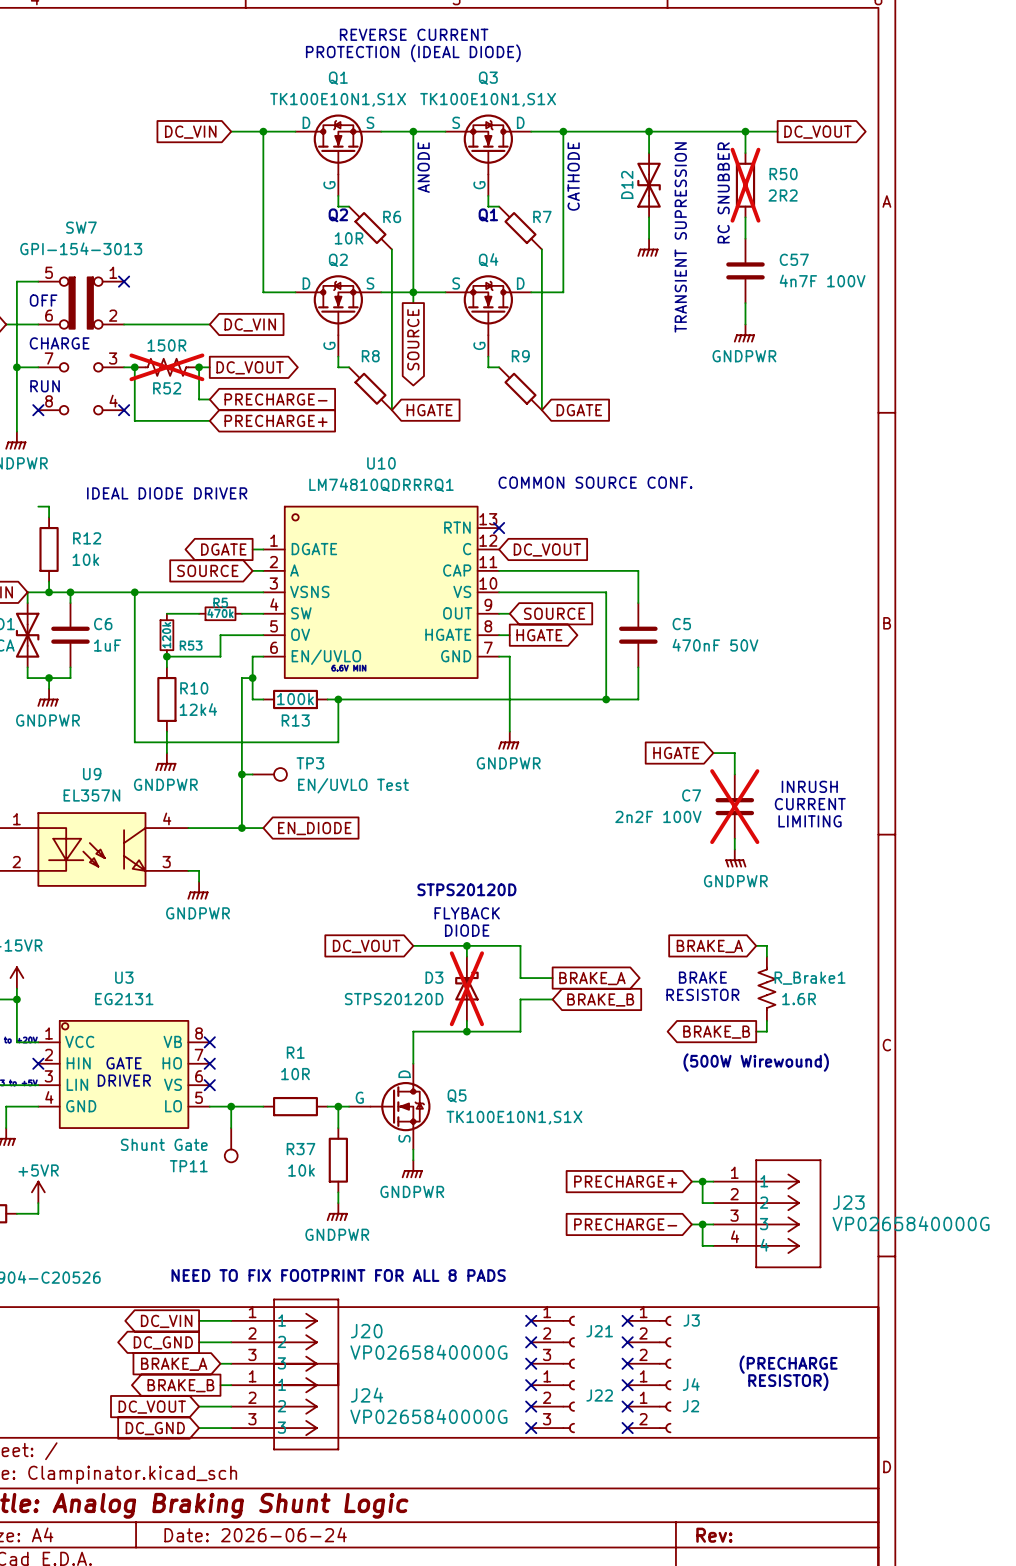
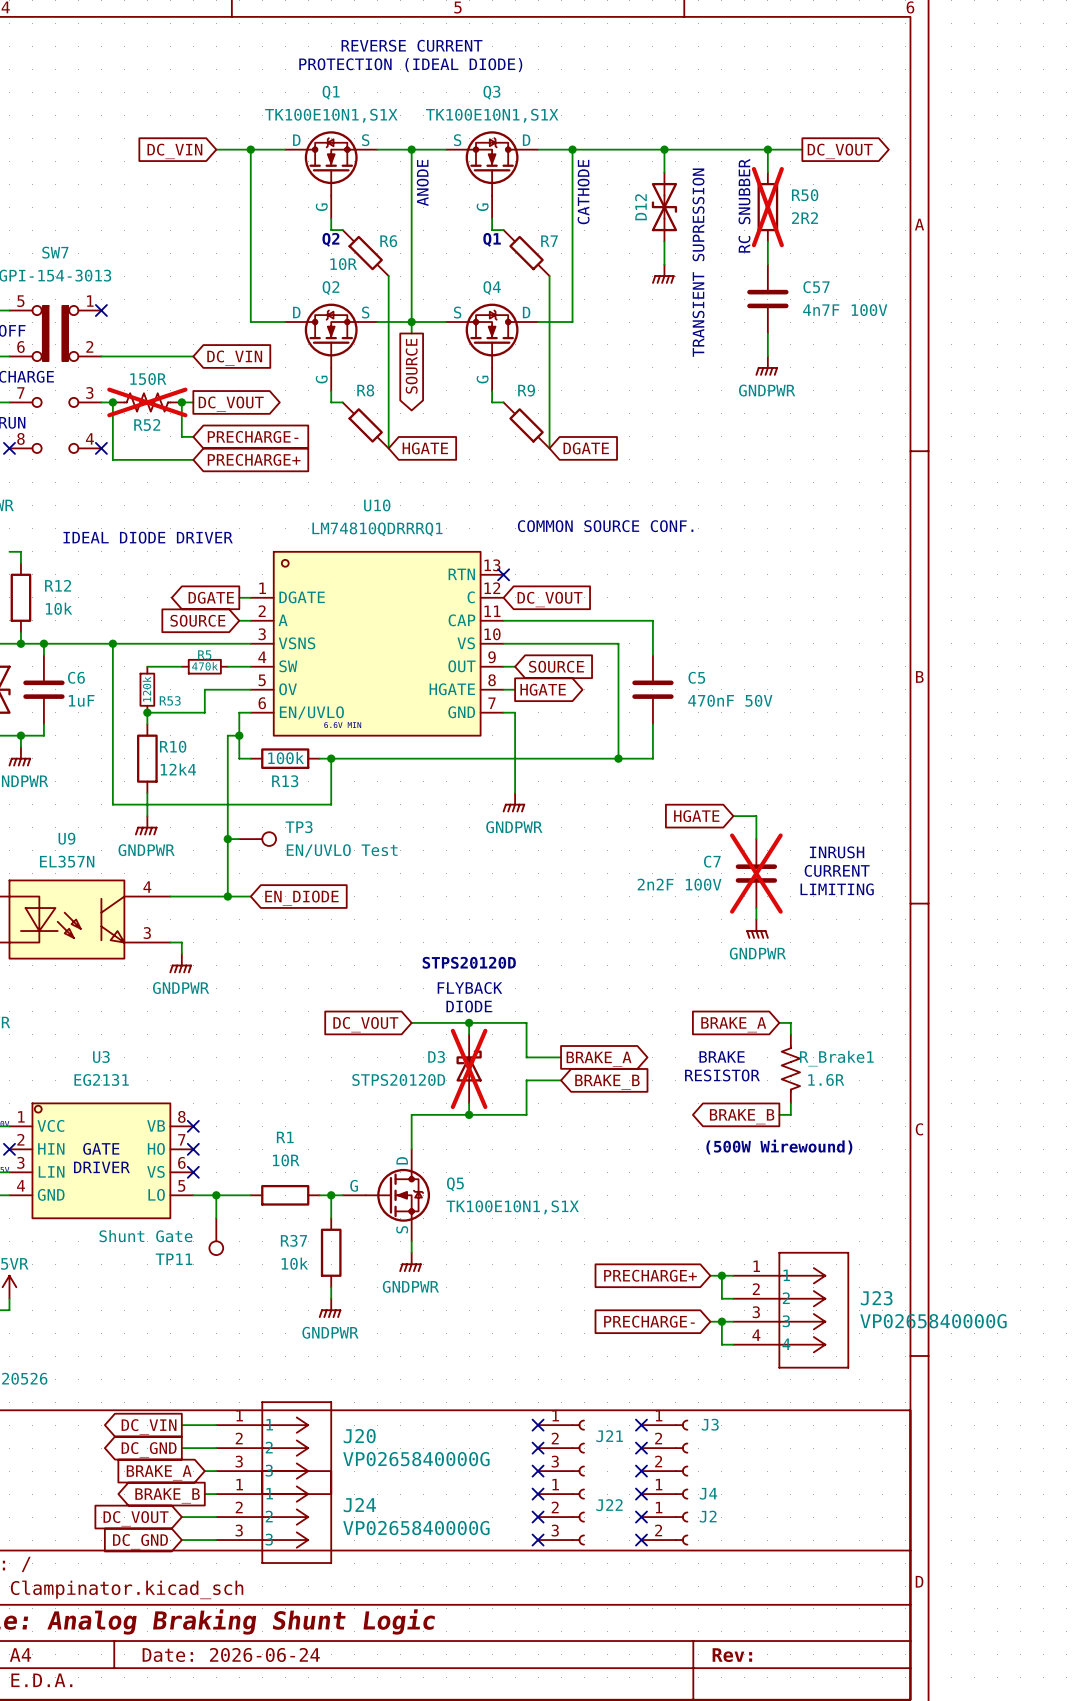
text: NEED TO FIX FOOTPRINT FOR ALL 8 PADS (338, 1275) -> none
text: (PRECHARGE (788, 1364) -> none
text: RESISTOR) (788, 1381) -> none

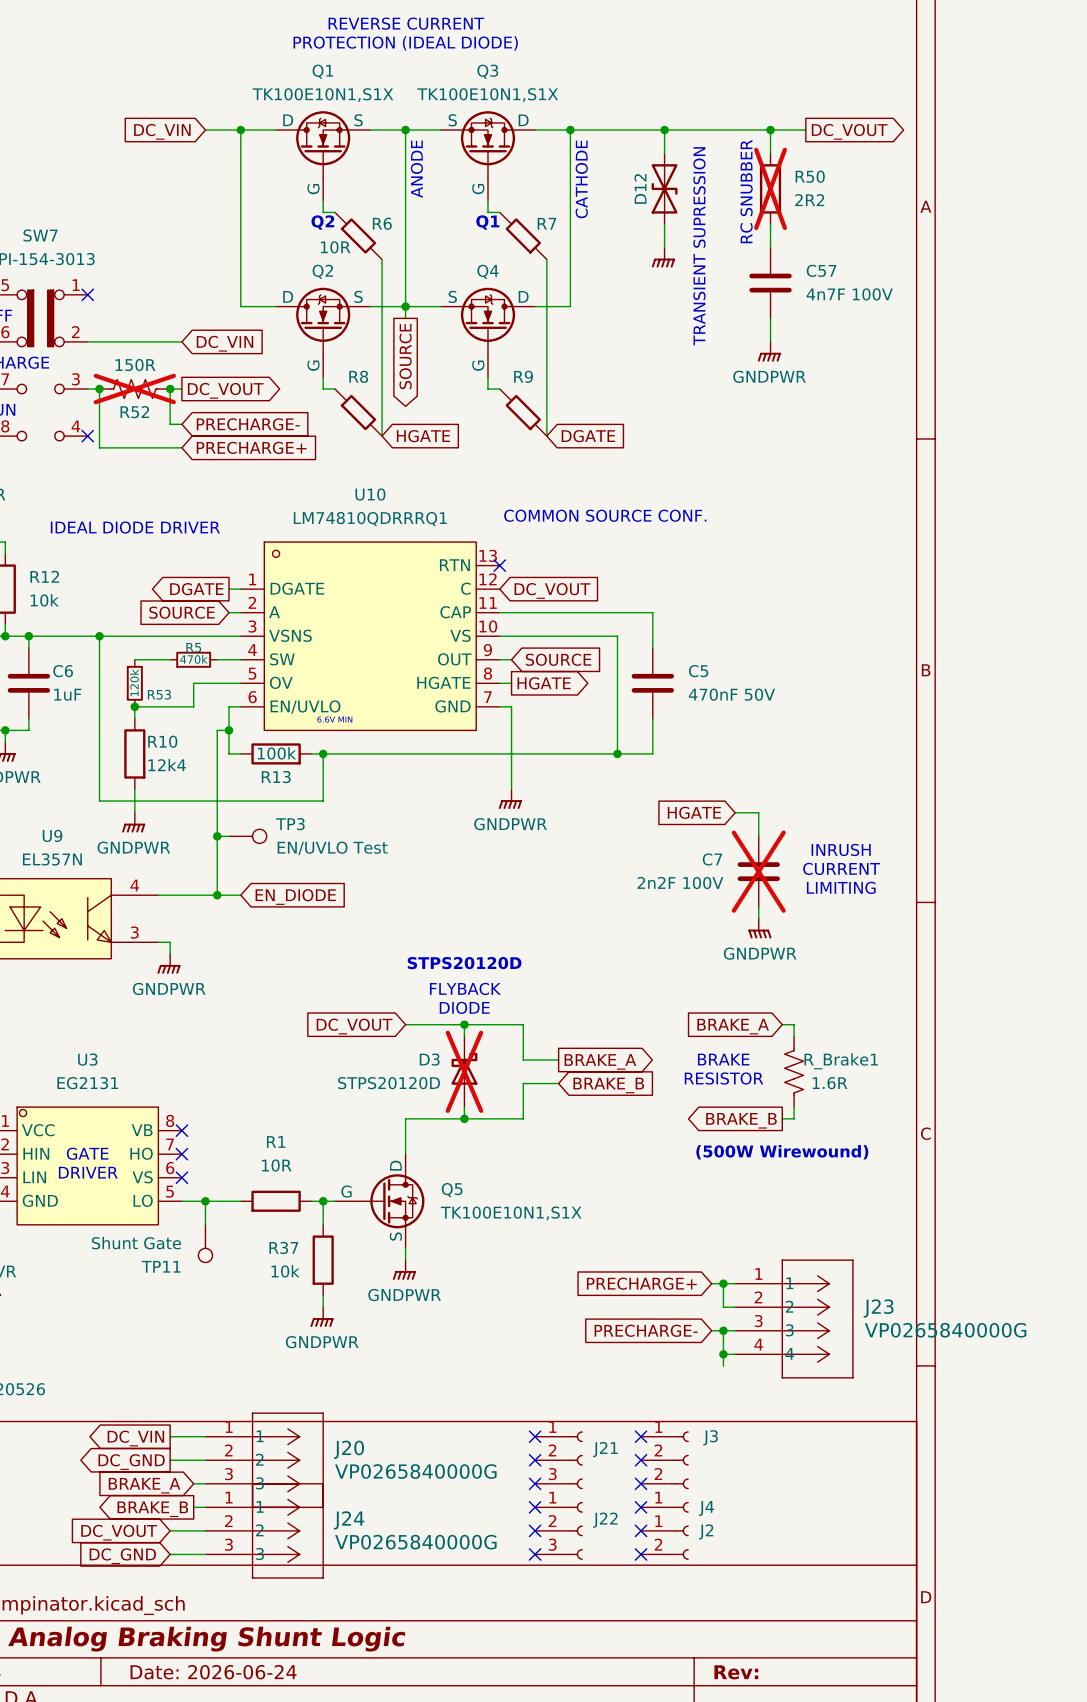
wire: none -> (723, 1354) (723, 1366)
junction: none -> (723, 1354)

